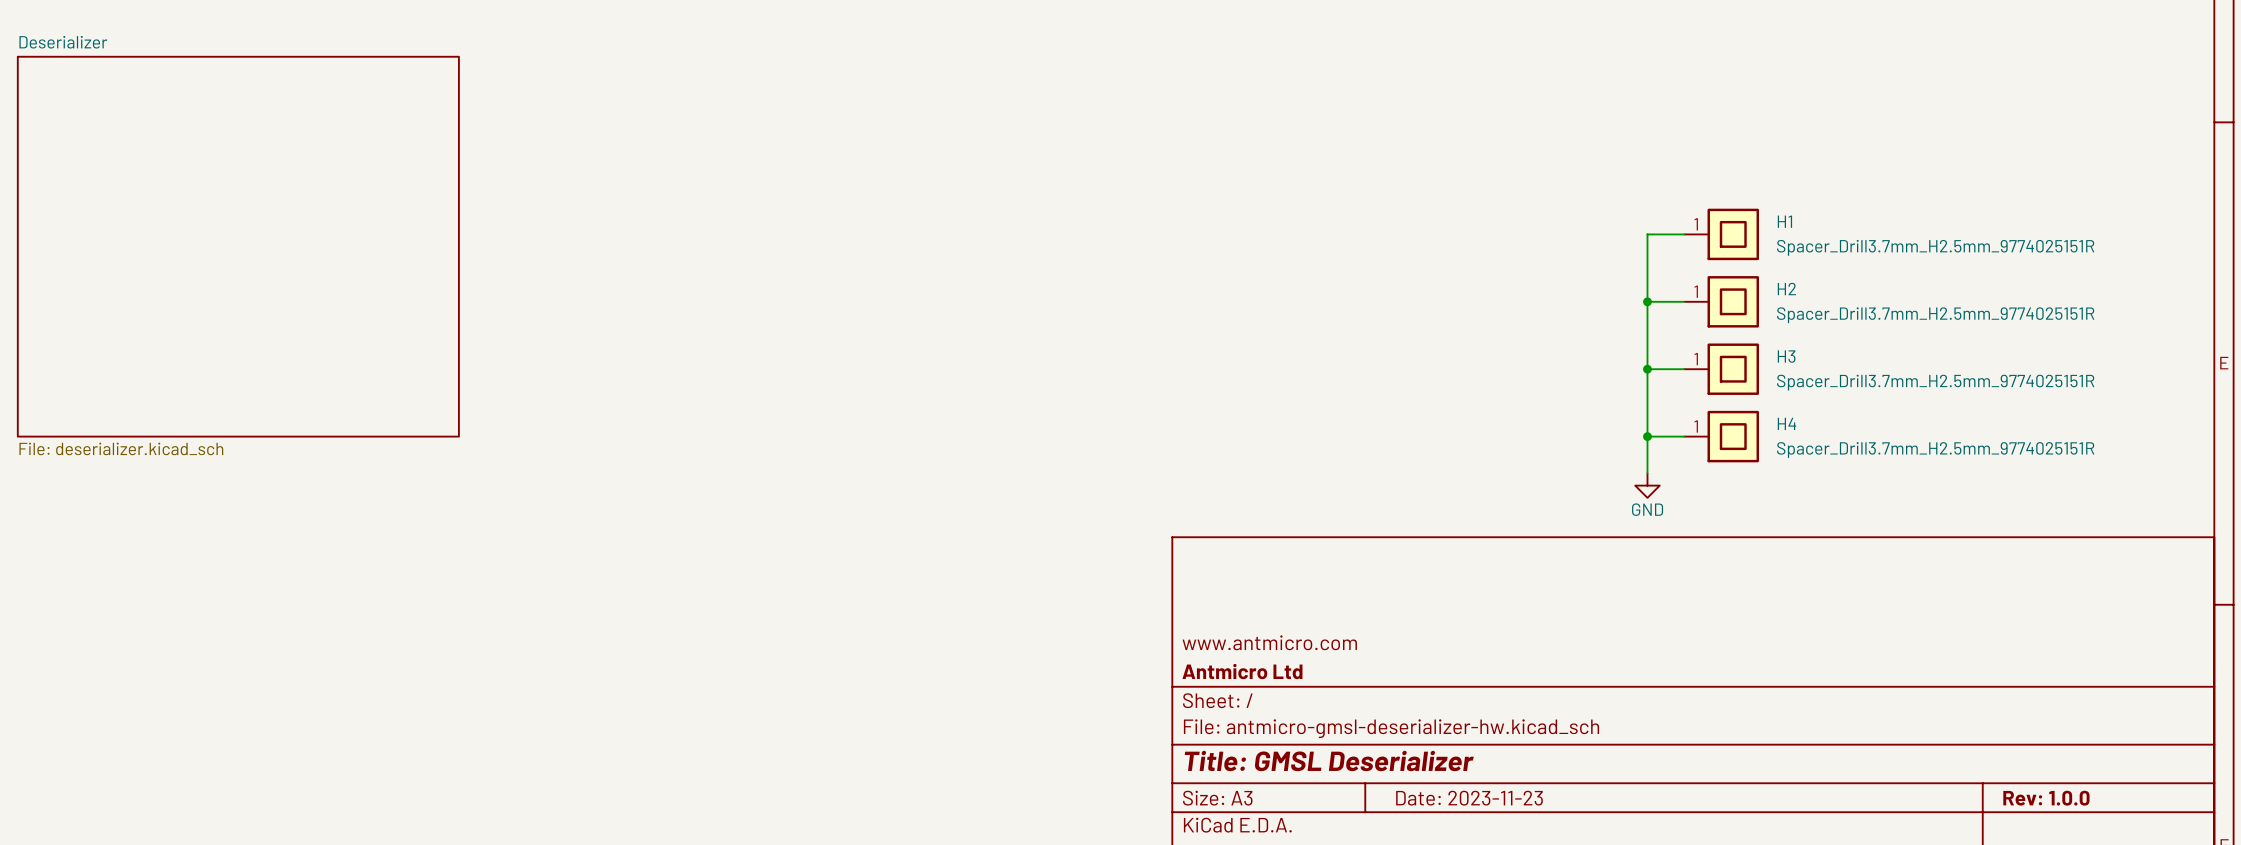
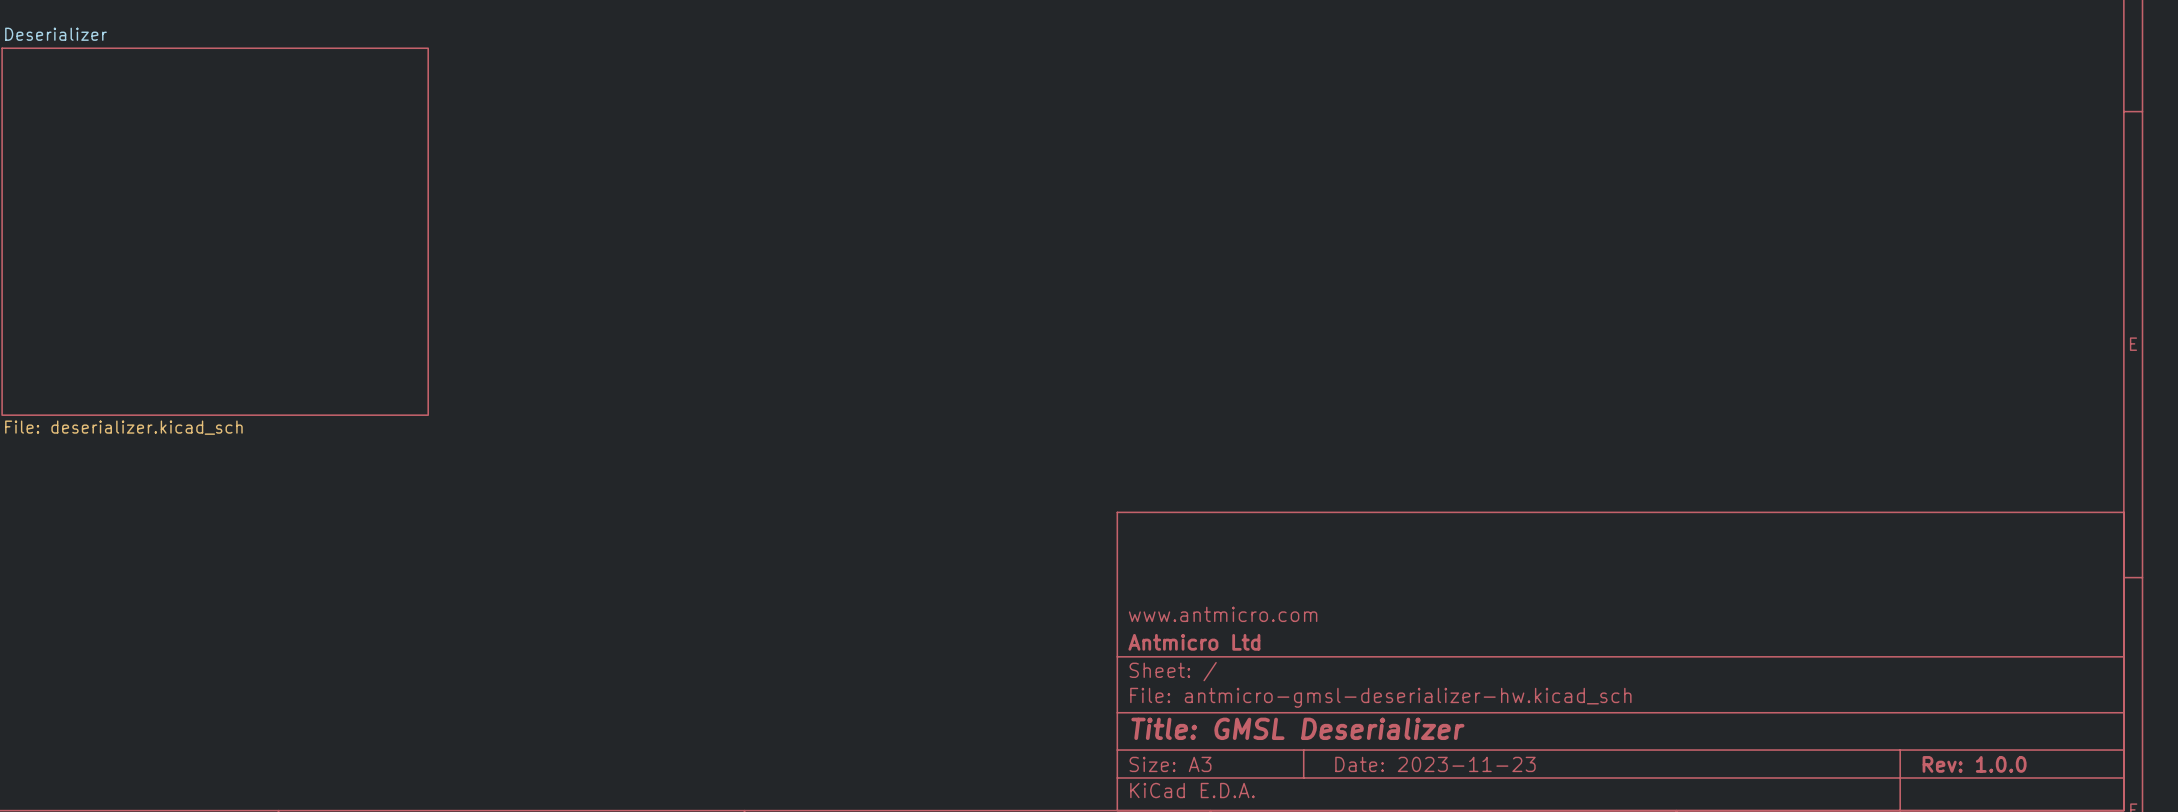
wire: (1684, 234) (1647, 234) (1647, 473) -> none
H1: Spacer_Drill3.7mm_H2.5mm_9774025151R (1721, 234) -> none
wire: (1647, 301) (1684, 301) -> none
junction: (1647, 301) -> none
H2: Spacer_Drill3.7mm_H2.5mm_9774025151R (1721, 301) -> none
wire: (1647, 369) (1684, 369) -> none
junction: (1647, 369) -> none
H3: Spacer_Drill3.7mm_H2.5mm_9774025151R (1721, 369) -> none
wire: (1647, 436) (1684, 436) -> none
junction: (1647, 436) -> none
H4: Spacer_Drill3.7mm_H2.5mm_9774025151R (1721, 436) -> none
power symbol: GND (1647, 485) -> none

